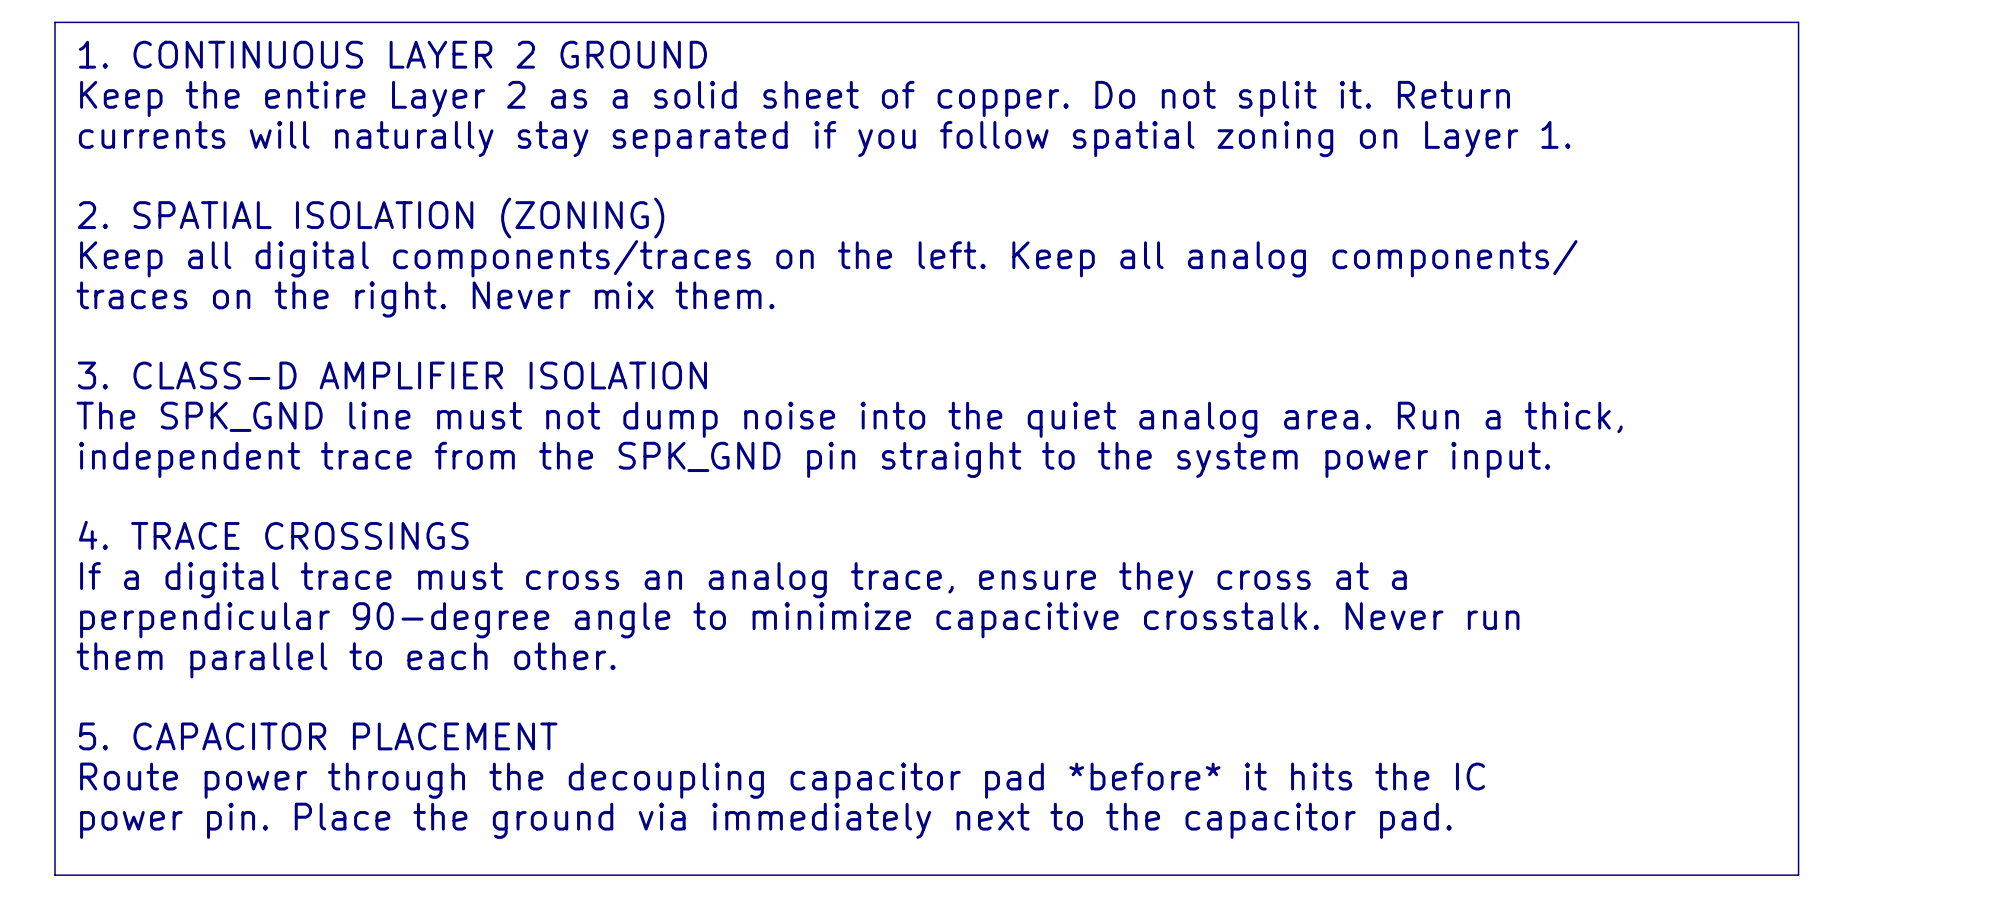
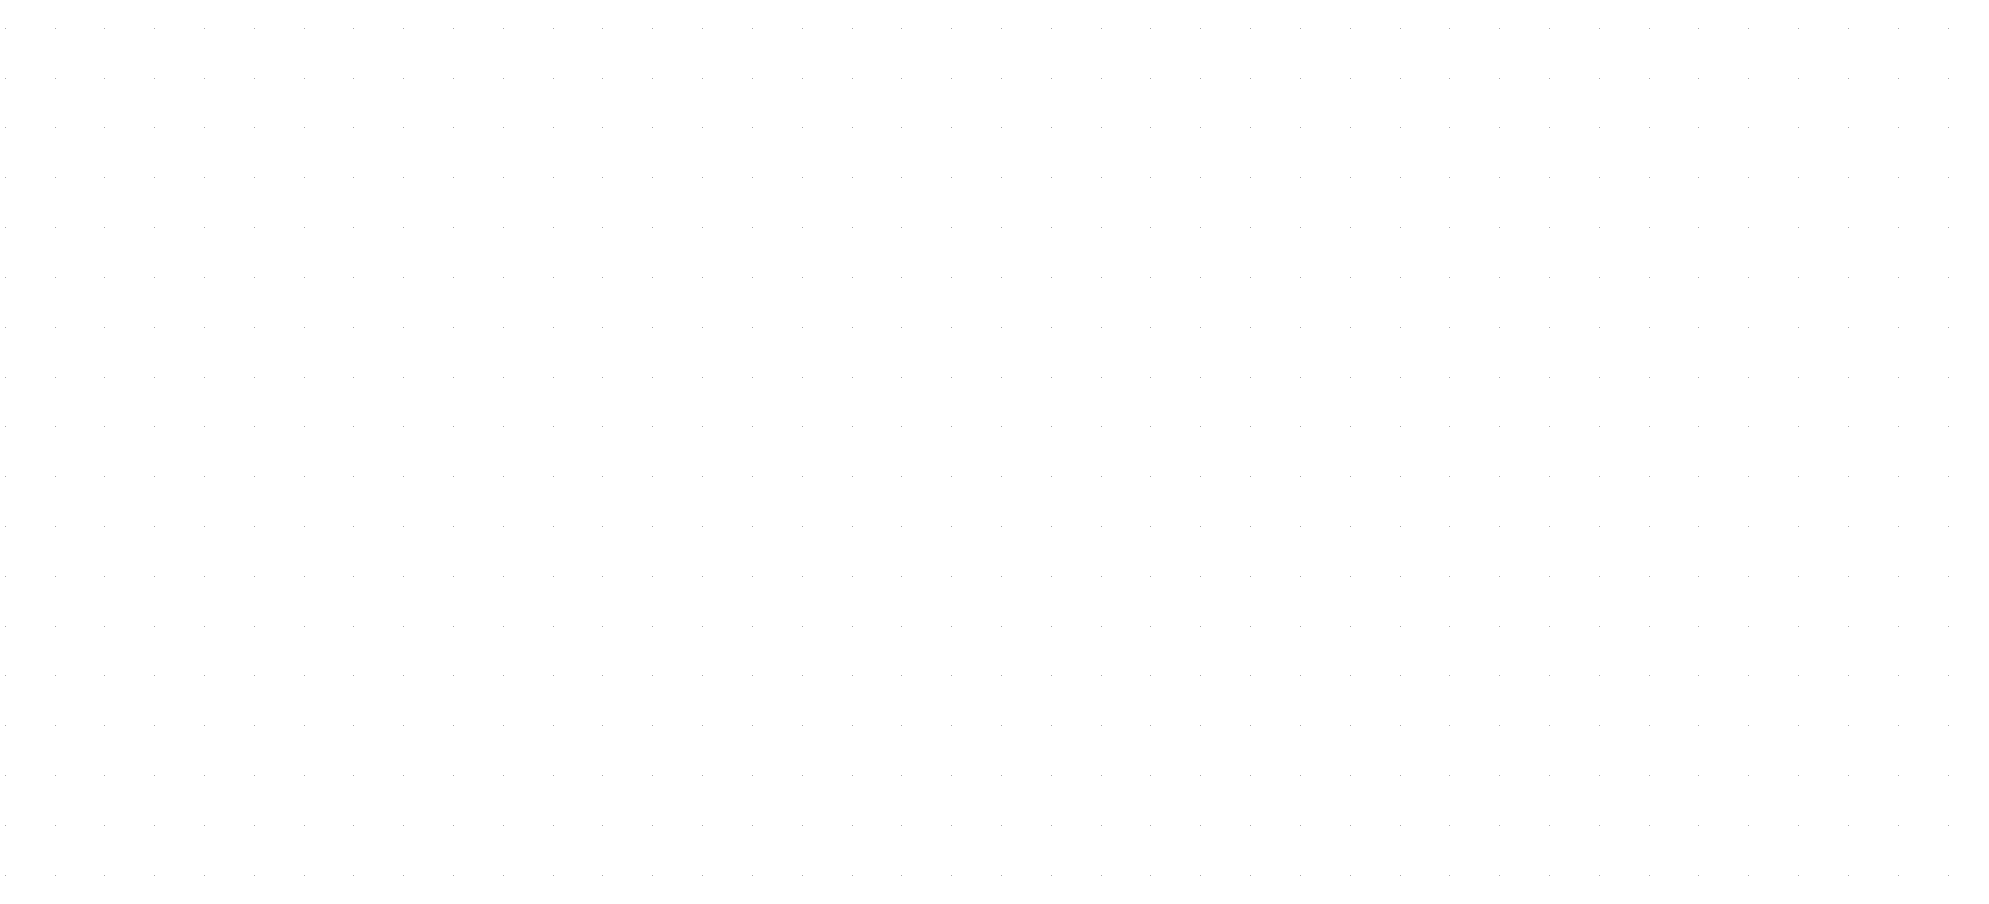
line: (55, 22) (1798, 22) (1798, 875) (55, 875) (55, 22) -> none
text: 1. CONTINUOUS LAYER 2 GROUND (392, 54) -> none
text: Keep the entire Layer 2 as a solid sheet of copper. Do not split it. Return (795, 98) -> none
text: currents will naturally stay separated if you follow spatial zoning on Layer 1. (824, 139) -> none
text: 2. SPATIAL ISOLATION (ZONING) (370, 218) -> none
text: Keep all digital components/traces on the left. Keep all analog components/ (828, 258) -> none
text: traces on the right. Never mix them. (425, 299) -> none
text: 3. CLASS-D AMPLIFIER ISOLATION (392, 375) -> none
text: The SPK_GND line must not dump noise into the quiet analog area. Run a thick, (849, 419) -> none
text: independent trace from the SPK_GND pin straight to the system power input. (814, 459) -> none
text: 4. TRACE CROSSINGS (273, 535) -> none
text: If a digital trace must cross an analog trace, ensure they cross at a (743, 580) -> none
text: perpendicular 90-degree angle to minimize capacitive crosstalk. Never run (799, 620) -> none
text: them parallel to each other. (346, 660) -> none
text: 5. CAPACITOR PLACEMENT (318, 736) -> none
text: Route power through the decoupling capacitor pad *before* it hits the IC (782, 780) -> none
text: power pin. Place the ground via immediately next to the capacitor pad. (765, 820) -> none

